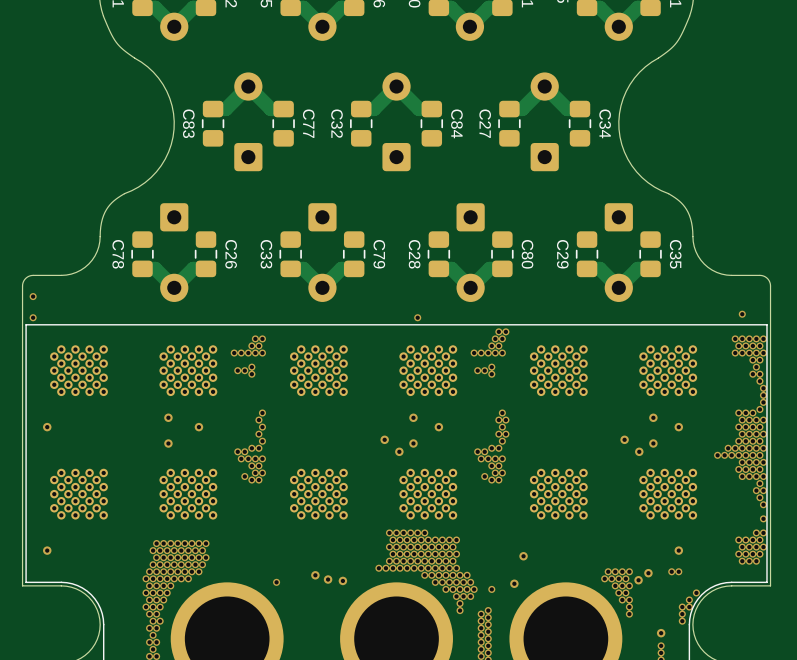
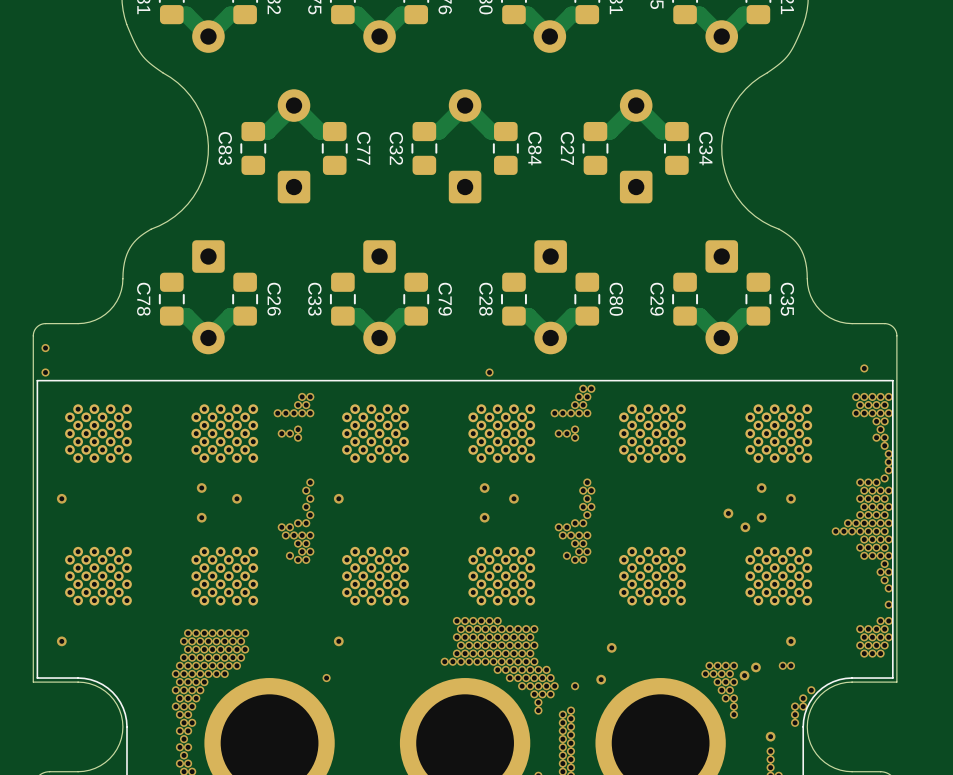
via: none -> (338, 498)
via: (384, 439) -> none
via: (399, 451) -> none
via: none -> (338, 641)
via: (315, 575) -> none
via: (328, 579) -> none
via: (342, 580) -> none

